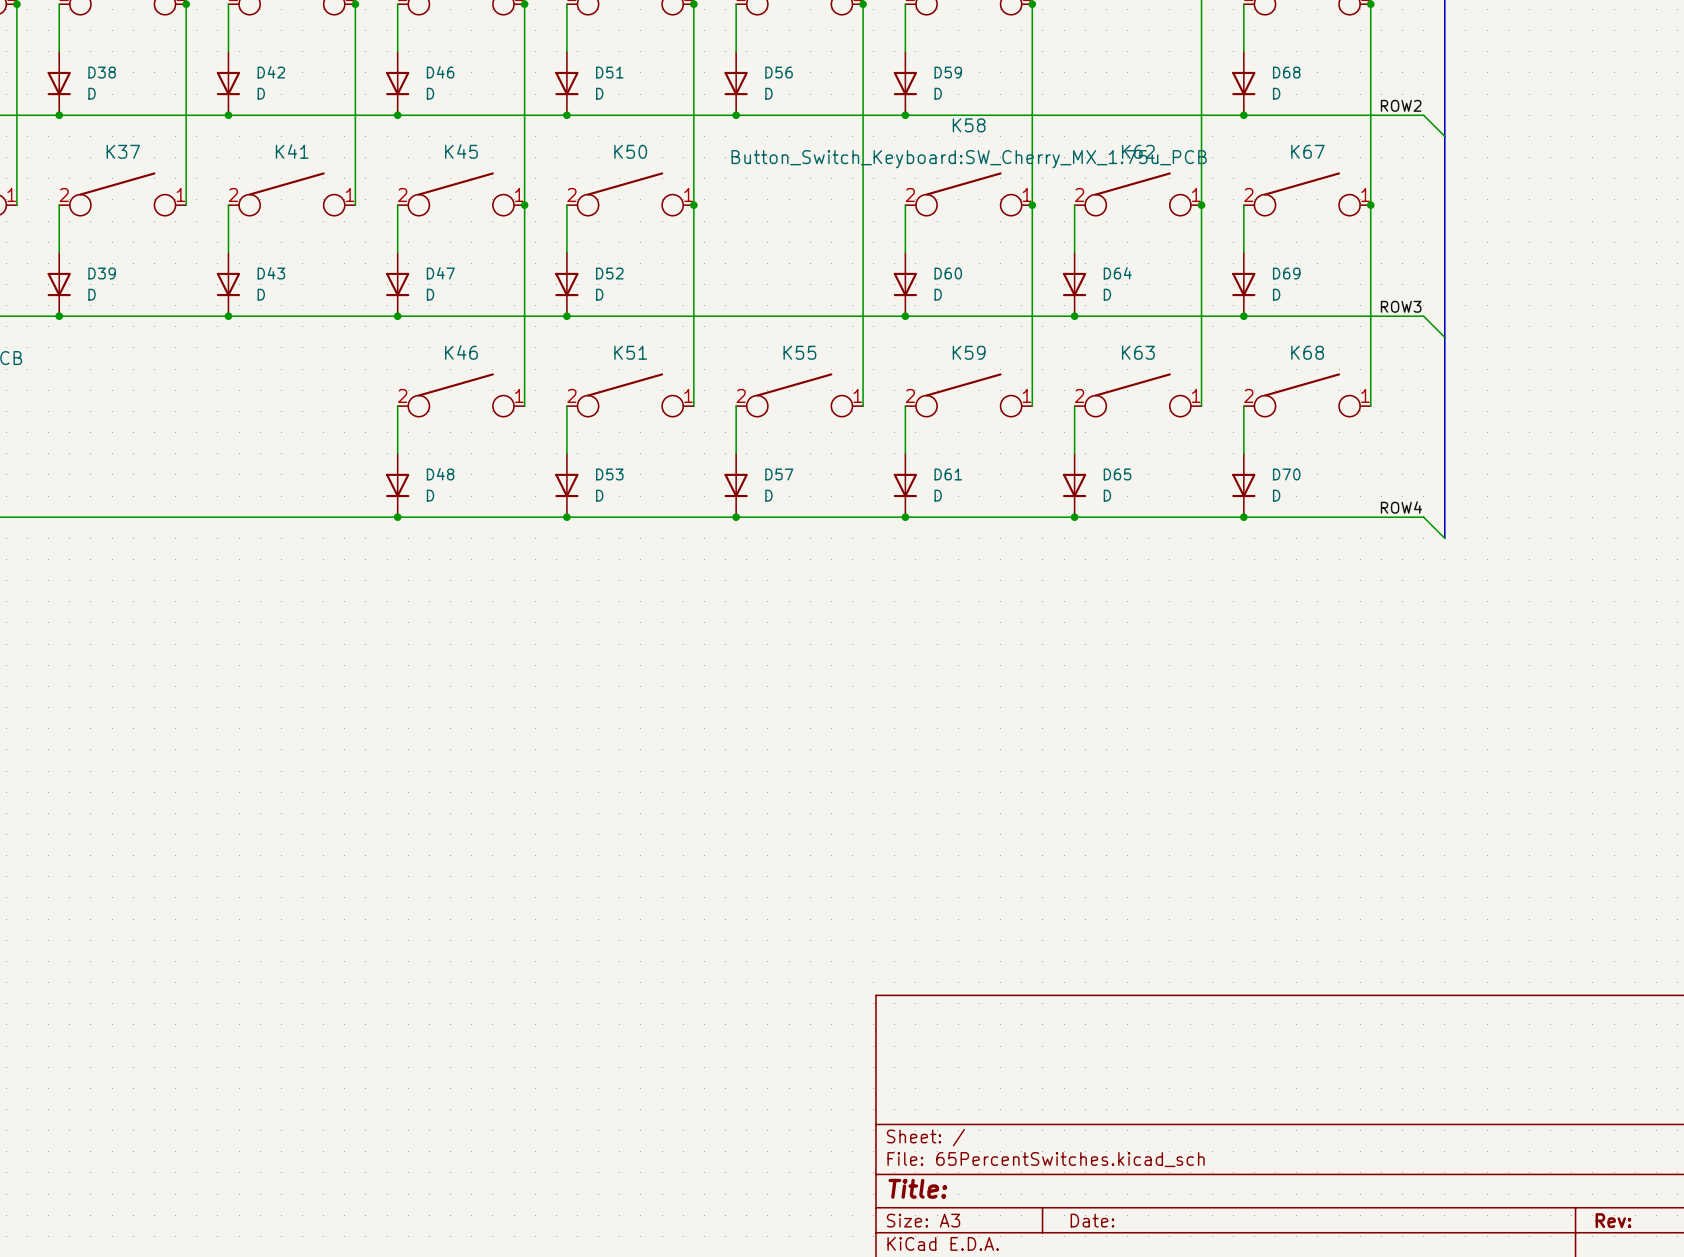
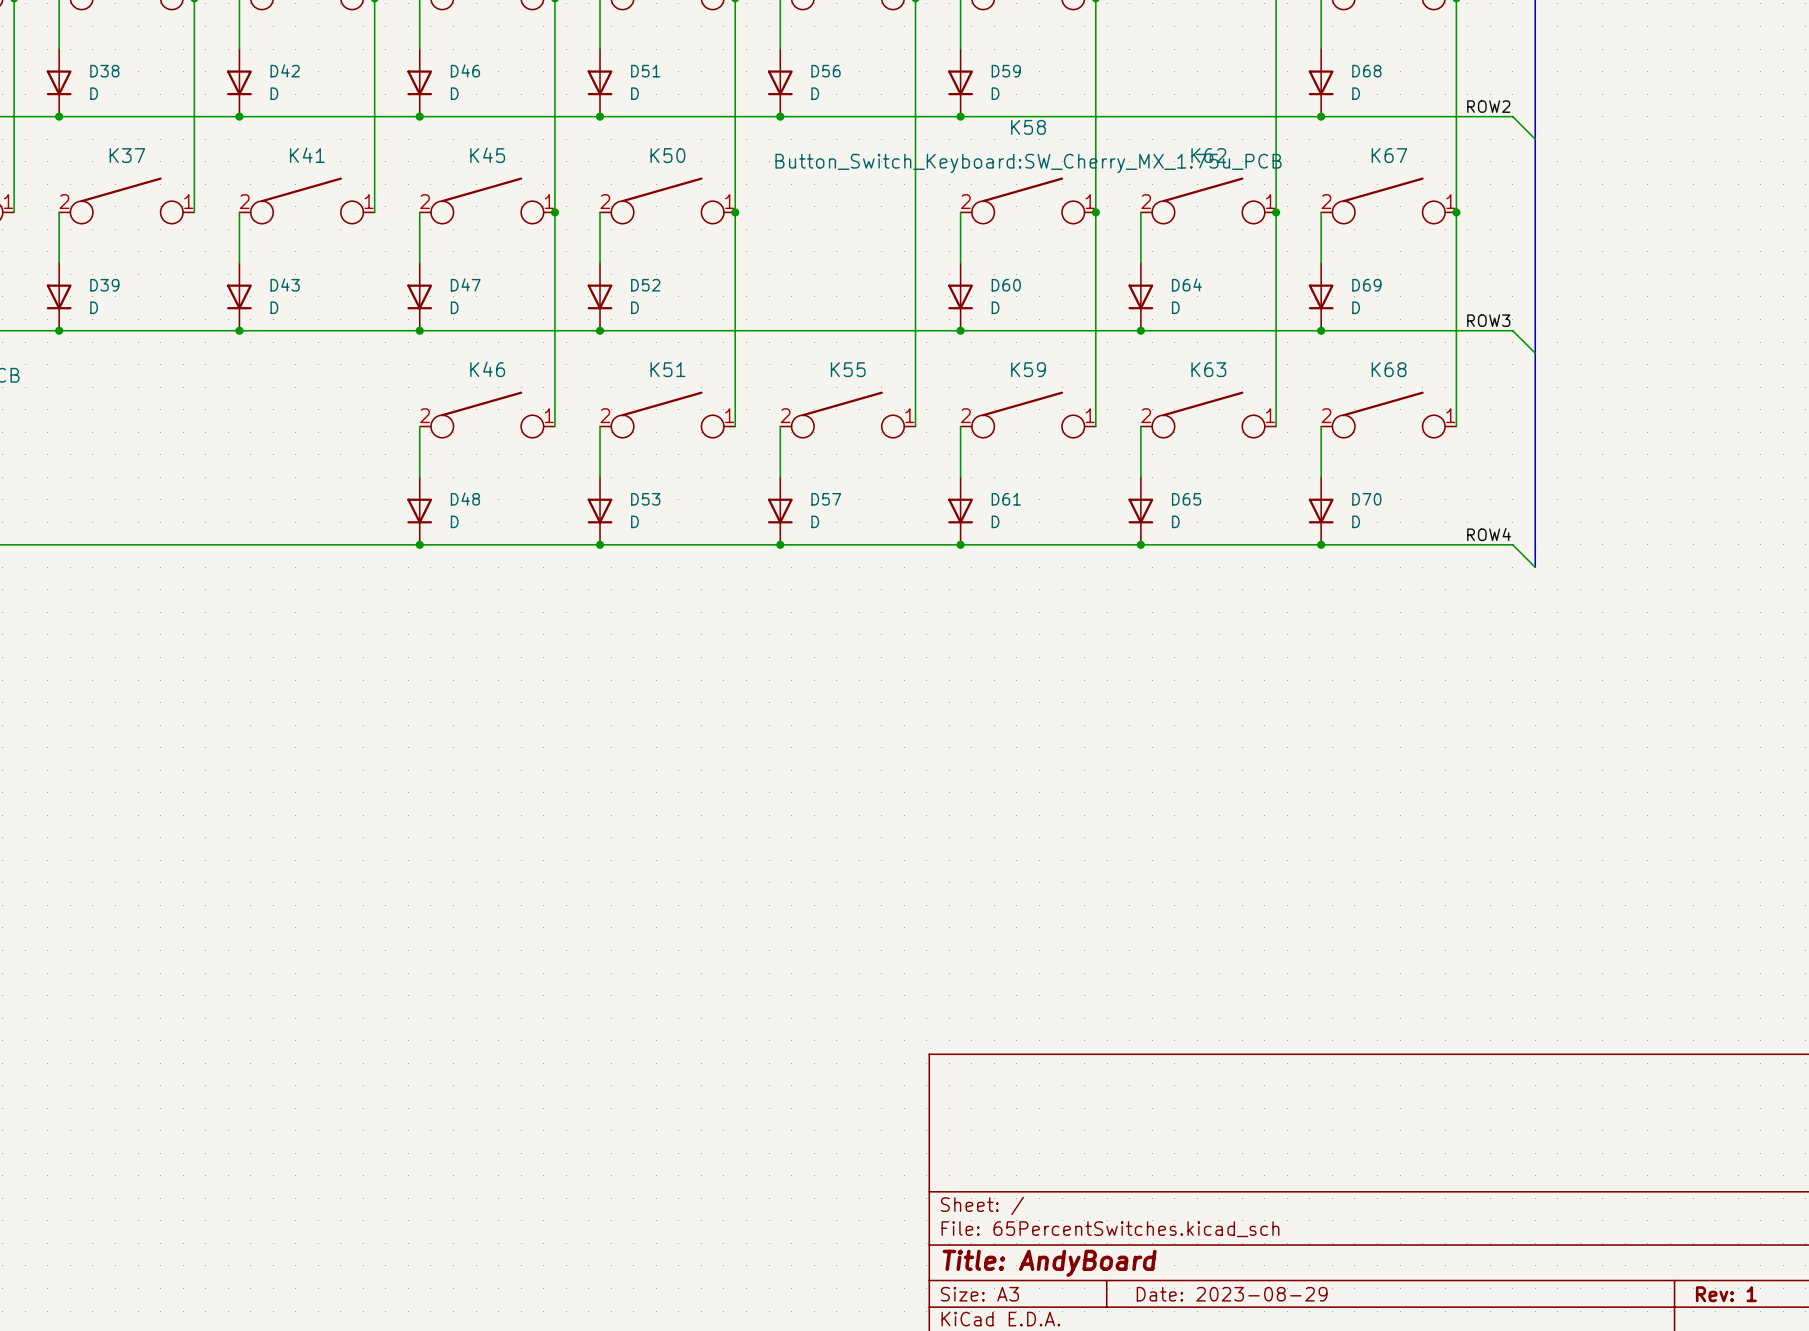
title block: Title: (917, 1188) -> Title: AndyBoard (1049, 1263)
title block: Date: (1092, 1220) -> Date: 2023-08-29 (1232, 1294)
title block: Rev: (1613, 1220) -> Rev: 1 (1726, 1294)

